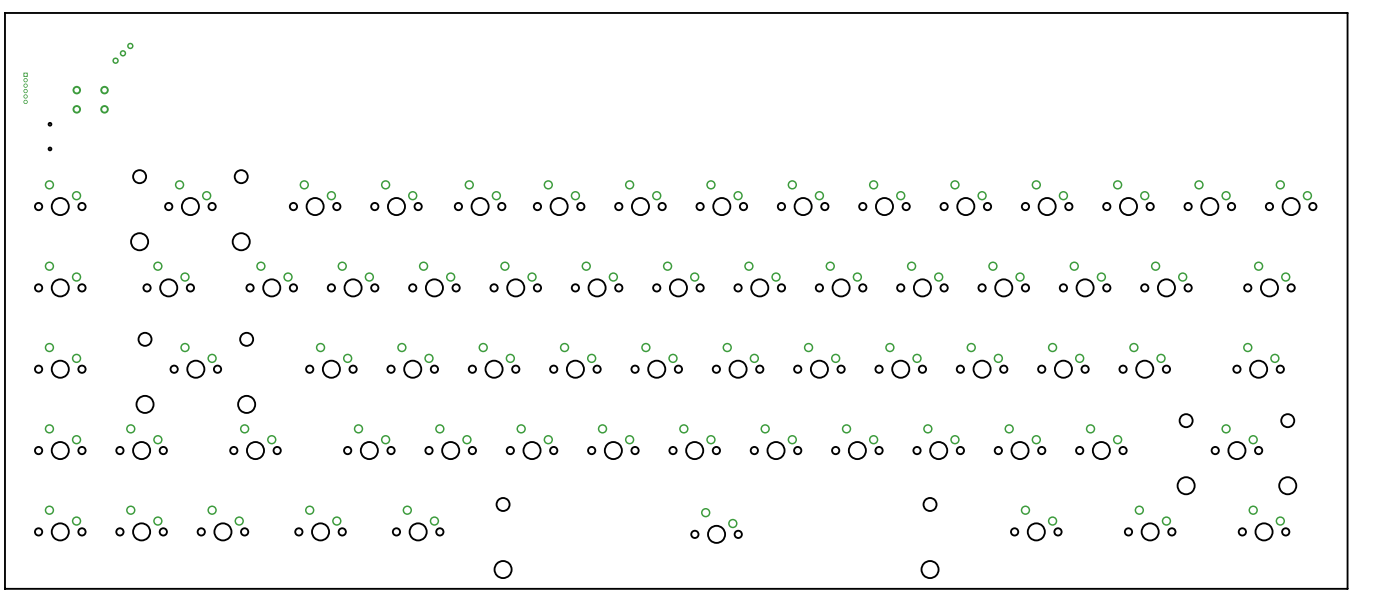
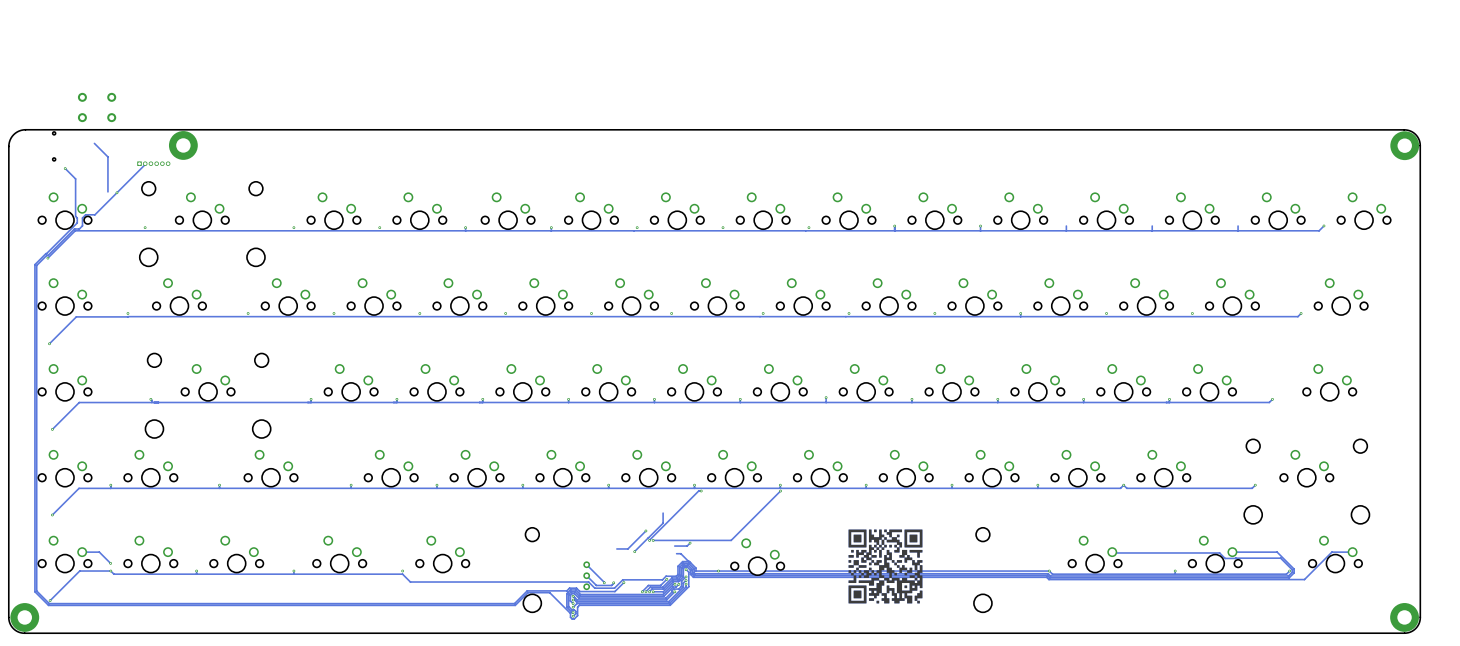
board edge: (1347, 12) (4, 12) (4, 588) (1347, 588) (1347, 12) -> (25, 129) (1409, 130) (1417, 137) (1420, 145) (1419, 622) (1413, 630) (1404, 633) (19, 632) (11, 625) (8, 617) (8, 146) (13, 134) (25, 129)
part: (122, 53) -> none
part: (25, 88) -> none
track: none -> (94, 143) (107, 156) (107, 191)
part: none -> (183, 145)
part: none -> (1404, 145)
track: none -> (145, 163) (94, 214) (85, 214) (82, 217) (82, 225) (79, 229) (74, 229) (36, 265) (36, 591) (49, 603) (514, 603) (527, 590) (566, 590) (569, 588) (576, 588) (579, 591) (614, 591) (623, 582)
part: none -> (153, 163)
track: none -> (65, 168) (75, 178) (77, 222) (34, 264) (34, 591) (48, 605) (515, 605) (527, 592) (549, 592) (570, 613) (570, 617) (574, 618) (577, 615) (579, 605) (670, 605) (688, 586) (688, 572) (686, 569)
via: none -> (65, 168)
via: none -> (116, 192)
track: none -> (1323, 225) (1319, 230) (894, 230)
via: none -> (1323, 225)
track: none -> (894, 226) (894, 230) (75, 230) (47, 258)
via: none -> (894, 226)
track: none -> (980, 226) (980, 230)
via: none -> (980, 226)
track: none -> (1066, 226) (1066, 230)
track: none -> (1152, 226) (1152, 230)
track: none -> (1238, 226) (1238, 230)
via: none -> (145, 227)
via: none -> (293, 227)
via: none -> (379, 227)
track: none -> (465, 227) (465, 230)
via: none -> (465, 227)
track: none -> (551, 227) (551, 230)
via: none -> (551, 227)
via: none -> (637, 227)
via: none -> (723, 227)
via: none -> (808, 227)
via: none -> (47, 258)
via: none -> (127, 313)
via: none -> (248, 313)
via: none -> (333, 313)
via: none -> (419, 313)
via: none -> (505, 313)
via: none -> (591, 313)
via: none -> (671, 313)
via: none -> (763, 313)
via: none -> (849, 313)
via: none -> (934, 313)
track: none -> (1020, 313) (1020, 316)
via: none -> (1020, 313)
via: none -> (1106, 313)
via: none -> (1192, 313)
track: none -> (1301, 313) (1297, 316) (76, 316) (49, 343)
via: none -> (1301, 313)
via: none -> (49, 343)
track: none -> (826, 397) (826, 402)
via: none -> (826, 397)
track: none -> (150, 399) (151, 402)
via: none -> (150, 399)
track: none -> (311, 399) (311, 402)
via: none -> (311, 399)
track: none -> (396, 399) (396, 402)
via: none -> (396, 399)
track: none -> (482, 399) (482, 402)
via: none -> (482, 399)
track: none -> (568, 399) (568, 402)
via: none -> (568, 399)
track: none -> (654, 399) (654, 402)
via: none -> (654, 399)
track: none -> (740, 399) (740, 402)
via: none -> (740, 399)
track: none -> (911, 399) (911, 402)
via: none -> (911, 399)
track: none -> (997, 399) (997, 402)
via: none -> (997, 399)
track: none -> (1083, 399) (1083, 402)
via: none -> (1083, 399)
track: none -> (1169, 399) (1169, 402)
via: none -> (1169, 399)
track: none -> (1272, 399) (1269, 402) (154, 402)
via: none -> (1272, 399)
track: none -> (158, 402) (79, 402) (52, 429)
via: none -> (52, 429)
track: none -> (110, 485) (110, 488) (79, 488) (52, 515)
via: none -> (110, 485)
track: none -> (219, 485) (219, 488)
via: none -> (219, 485)
track: none -> (351, 485) (351, 488)
via: none -> (351, 485)
track: none -> (436, 485) (436, 488)
via: none -> (436, 485)
track: none -> (522, 485) (522, 488)
via: none -> (522, 485)
track: none -> (608, 485) (608, 488)
via: none -> (608, 485)
track: none -> (694, 485) (694, 488)
via: none -> (694, 485)
track: none -> (780, 485) (780, 488)
via: none -> (780, 485)
track: none -> (866, 485) (866, 488)
via: none -> (866, 485)
track: none -> (952, 485) (952, 488)
via: none -> (952, 485)
track: none -> (1037, 485) (1037, 488)
via: none -> (1037, 485)
via: none -> (1123, 485)
track: none -> (1255, 485) (1252, 488) (1126, 488) (1123, 485) (1120, 488) (110, 488)
via: none -> (1255, 485)
track: none -> (701, 491) (698, 491) (649, 540)
via: none -> (701, 491)
track: none -> (780, 491) (731, 540) (653, 540)
via: none -> (780, 491)
track: none -> (663, 513) (663, 523) (634, 551)
via: none -> (52, 515)
drawing: none -> [848, 529, 923, 604]
track: none -> (645, 530) (627, 548) (616, 548)
via: none -> (645, 530)
via: none -> (649, 540)
via: none -> (653, 540)
track: none -> (690, 543) (687, 546) (674, 546)
via: none -> (690, 543)
via: none -> (634, 551)
track: none -> (82, 552) (99, 552) (110, 563)
track: none -> (1112, 552) (1219, 552) (1225, 558) (1280, 558) (1292, 572) (1288, 575) (695, 573) (694, 568) (688, 563) (683, 563) (679, 567) (679, 575) (677, 578) (671, 578) (662, 587) (650, 587) (645, 591)
track: none -> (1232, 552) (1277, 552) (1294, 569) (1294, 572) (1289, 577) (694, 575) (692, 569) (687, 565) (684, 565) (681, 567) (681, 576) (677, 579) (672, 579) (663, 589) (652, 589) (649, 591)
track: none -> (1352, 552) (1331, 552) (1304, 579) (693, 577) (690, 574) (690, 570) (684, 567) (683, 576) (678, 581) (673, 581) (663, 591) (653, 591)
track: none -> (676, 553) (680, 553) (688, 561)
via: none -> (110, 563)
track: none -> (586, 564) (604, 582)
via: none -> (686, 569)
via: none -> (110, 571)
track: none -> (196, 571) (196, 574)
via: none -> (196, 571)
track: none -> (293, 571) (293, 574)
via: none -> (293, 571)
via: none -> (402, 571)
track: none -> (718, 571) (695, 571) (695, 568) (689, 561) (682, 561) (677, 566) (676, 576) (666, 576) (662, 579) (622, 579) (614, 588) (594, 588) (588, 582) (410, 582) (402, 574) (113, 574) (110, 571) (79, 571) (50, 600)
via: none -> (718, 571)
track: none -> (1049, 571) (718, 571)
via: none -> (1049, 571)
track: none -> (1175, 571) (1175, 574)
via: none -> (1175, 571)
track: none -> (1289, 571) (1286, 574) (1052, 574) (1049, 571)
via: none -> (1289, 571)
track: none -> (586, 575) (596, 585) (611, 585) (613, 582)
part: none -> (586, 575)
track: none -> (686, 576) (681, 581) (681, 586) (678, 589) (673, 589) (665, 598) (578, 598) (572, 593) (570, 601) (573, 603)
via: none -> (686, 576)
track: none -> (666, 579) (660, 585) (648, 585) (642, 591)
via: none -> (666, 579)
track: none -> (686, 580) (683, 583) (683, 587) (668, 601) (572, 600)
via: none -> (686, 580)
via: none -> (623, 582)
via: none -> (604, 582)
via: none -> (613, 582)
track: none -> (674, 584) (663, 594) (580, 594) (575, 589) (570, 589) (566, 593) (566, 607) (573, 612)
via: none -> (674, 584)
track: none -> (678, 584) (663, 596) (579, 596) (575, 591) (571, 591) (568, 594) (568, 606) (575, 611) (573, 616)
via: none -> (678, 584)
track: none -> (686, 584) (686, 586) (669, 603) (577, 603) (573, 607)
via: none -> (686, 584)
via: none -> (642, 591)
via: none -> (645, 591)
via: none -> (649, 591)
via: none -> (653, 591)
track: none -> (674, 591) (666, 599) (577, 599) (575, 598)
via: none -> (674, 591)
track: none -> (573, 596) (575, 598)
via: none -> (573, 596)
via: none -> (50, 600)
via: none -> (573, 600)
via: none -> (573, 603)
via: none -> (573, 607)
via: none -> (573, 612)
via: none -> (573, 616)
part: none -> (24, 617)
part: none -> (1404, 617)

